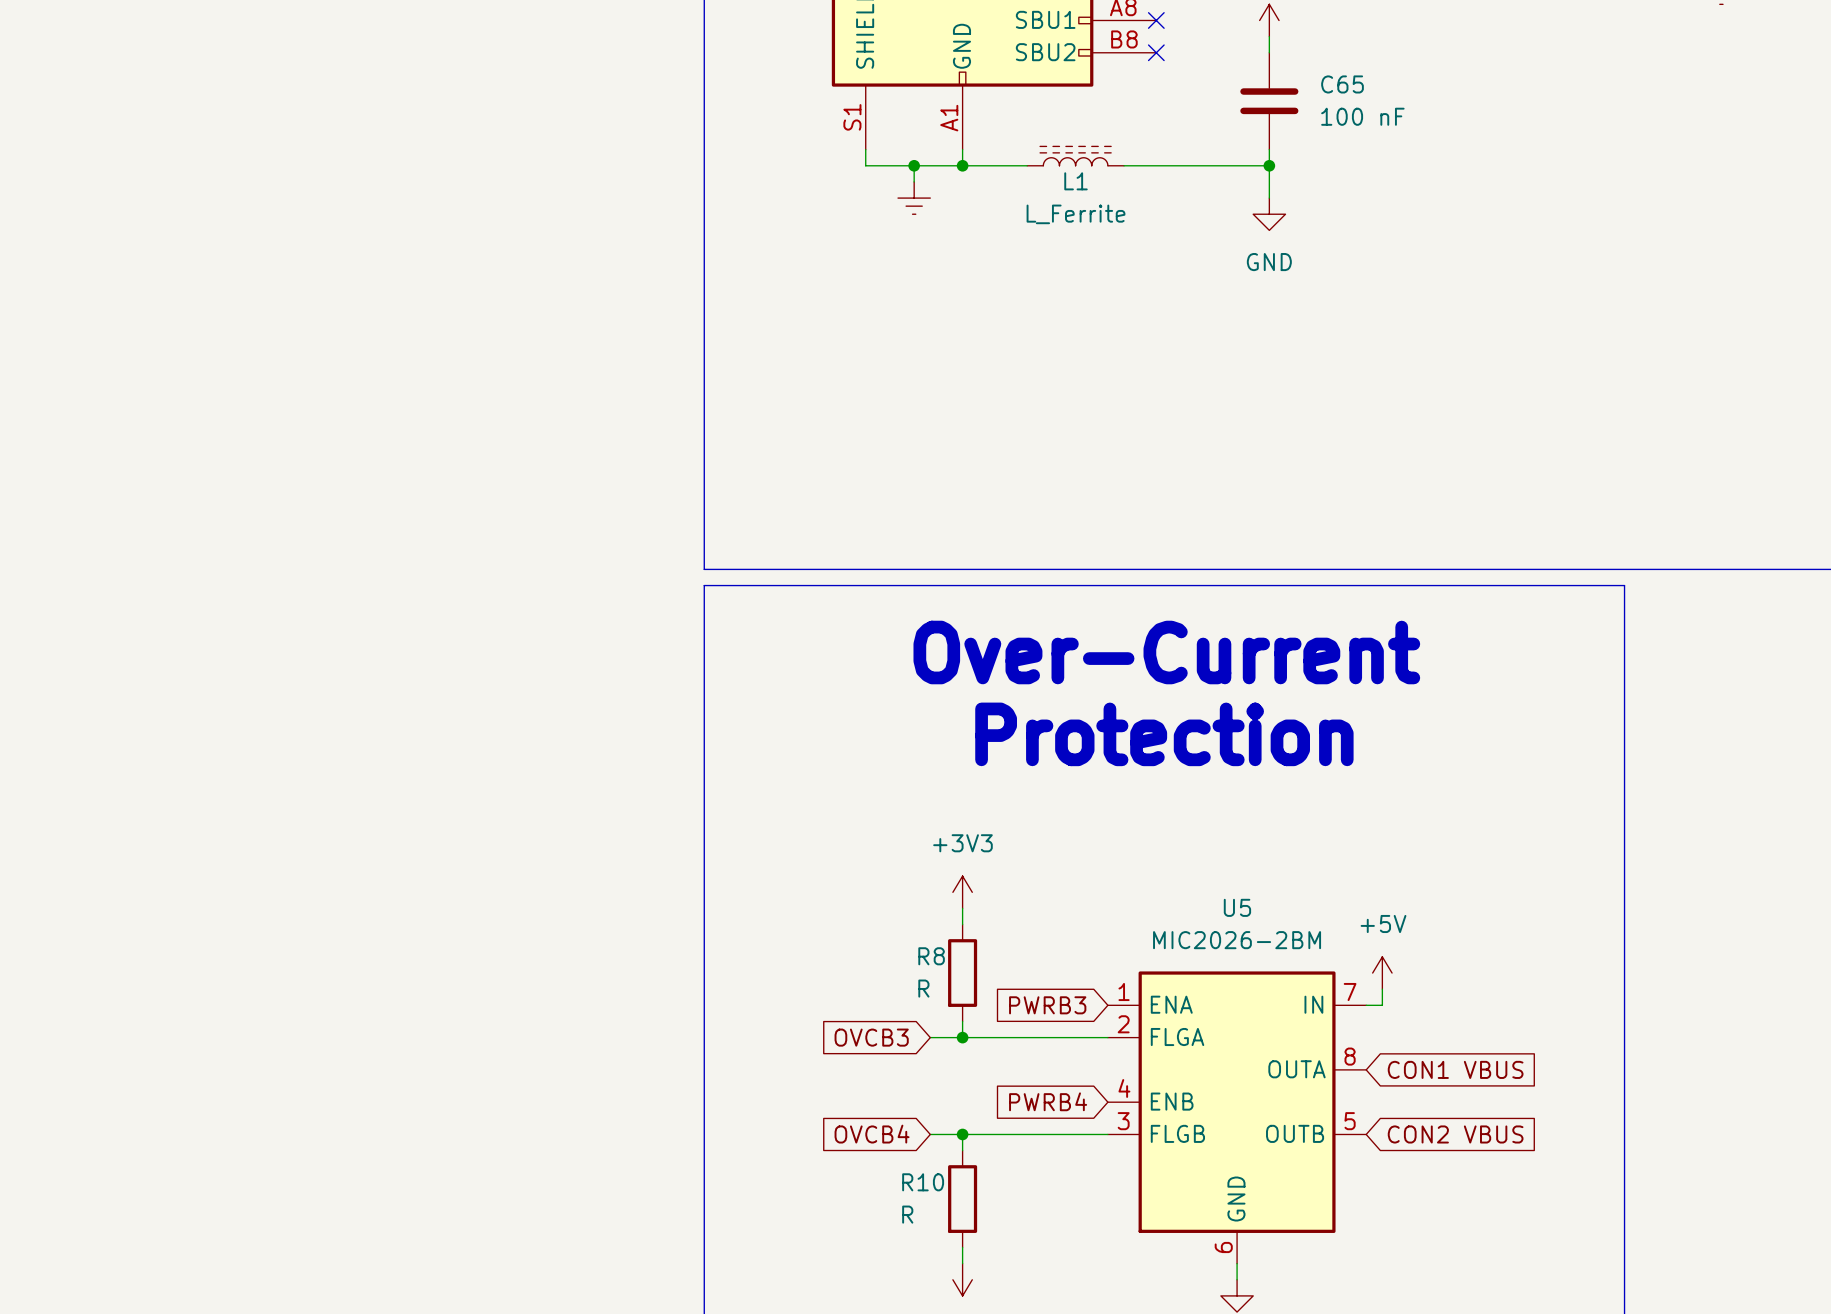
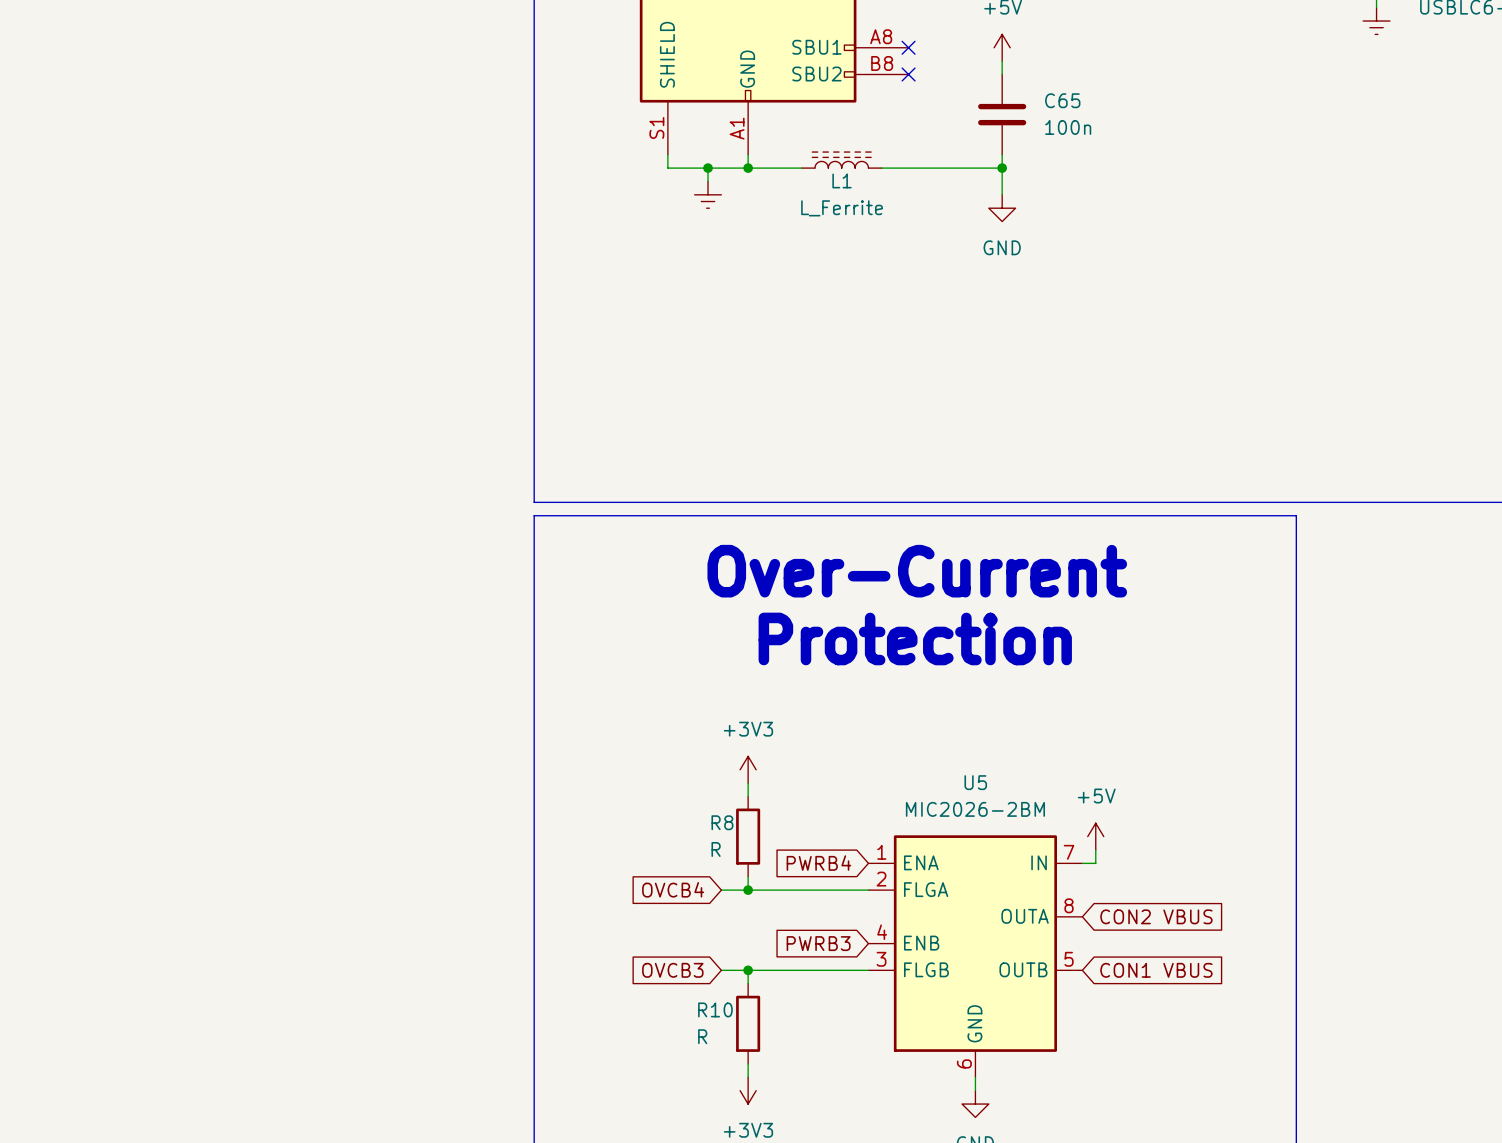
C65 value: 100 nF (1362, 116) -> 100n (1068, 127)
global label: PWRB3 (1047, 1005) -> PWRB4 (818, 863)
global label: OVCB3 (871, 1037) -> OVCB4 (673, 889)
global label: CON1 VBUS (1455, 1069) -> CON2 VBUS (1156, 916)
global label: PWRB4 (1048, 1101) -> PWRB3 (818, 943)
global label: OVCB4 (872, 1134) -> OVCB3 (672, 970)
global label: CON2 VBUS (1455, 1134) -> CON1 VBUS (1156, 970)

